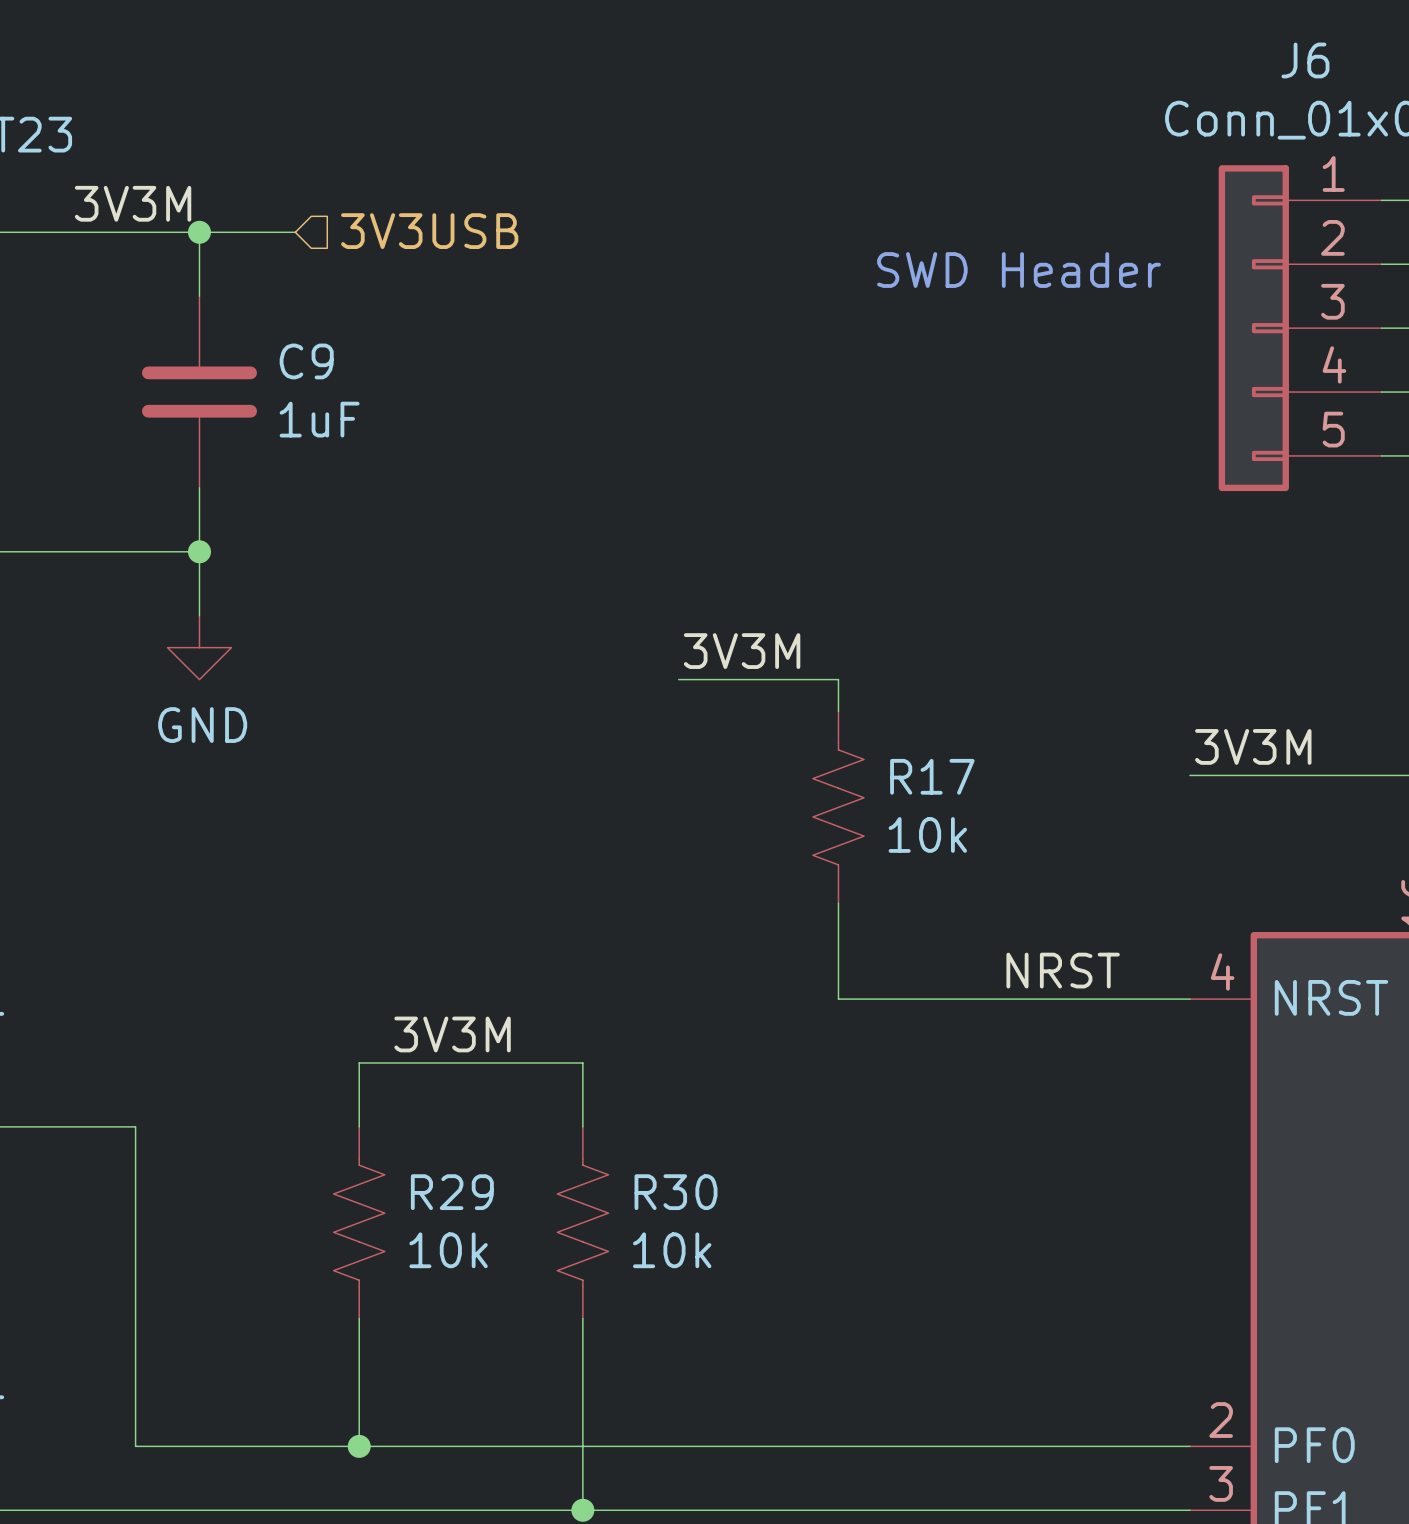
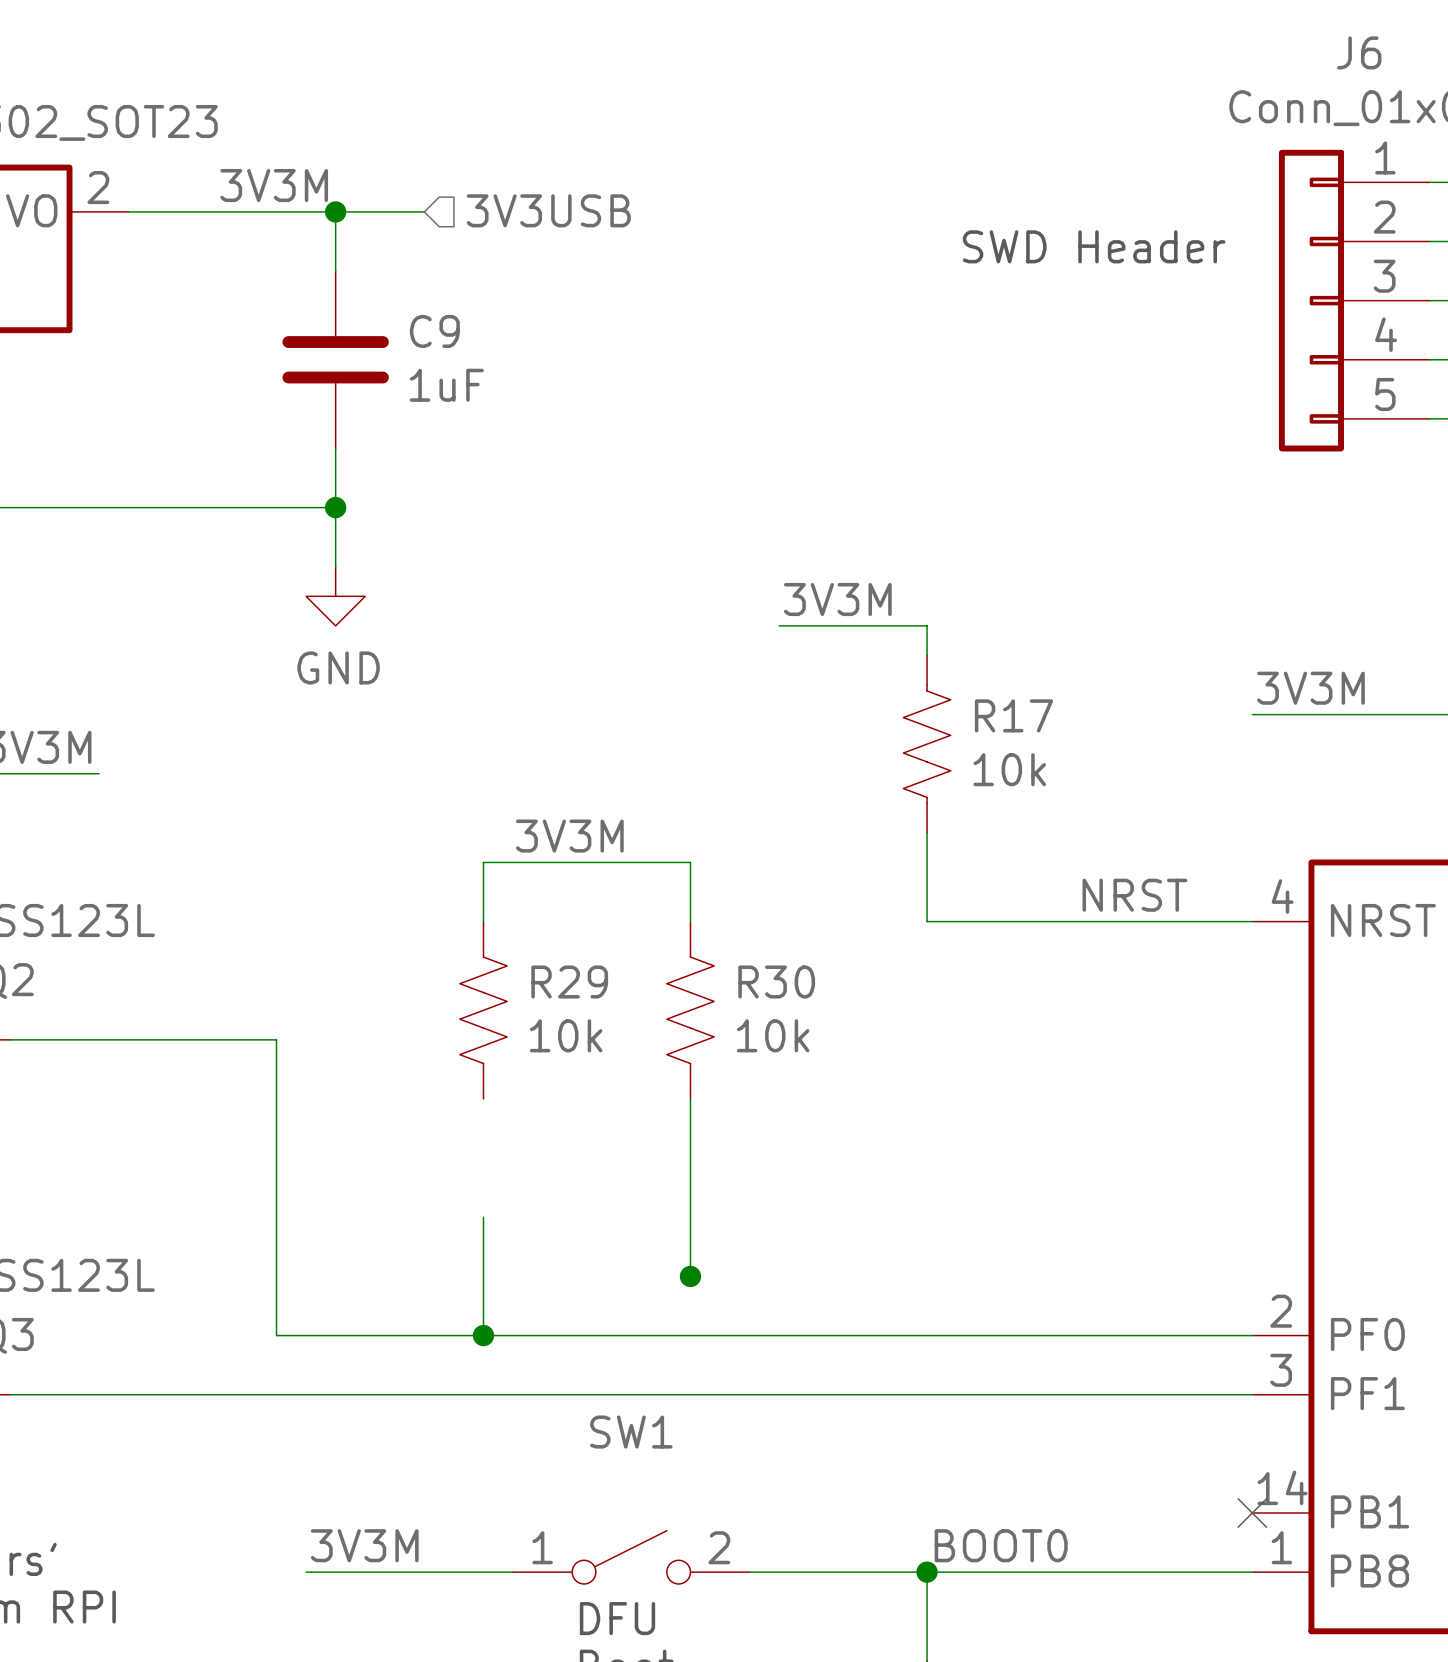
label position: 3V3M (452, 1034) -> 3V3M (569, 836)
wire: (359, 1126) (359, 1062) (582, 1062) (582, 1126) -> (483, 921) (483, 862) (690, 862) (690, 921)
R29 position: (359, 1222) -> (483, 1010)
R30 position: (582, 1222) -> (690, 1010)
wire: (582, 1382) (582, 1510) -> (690, 1099) (690, 1217)
junction position: (582, 1510) -> (690, 1276)

